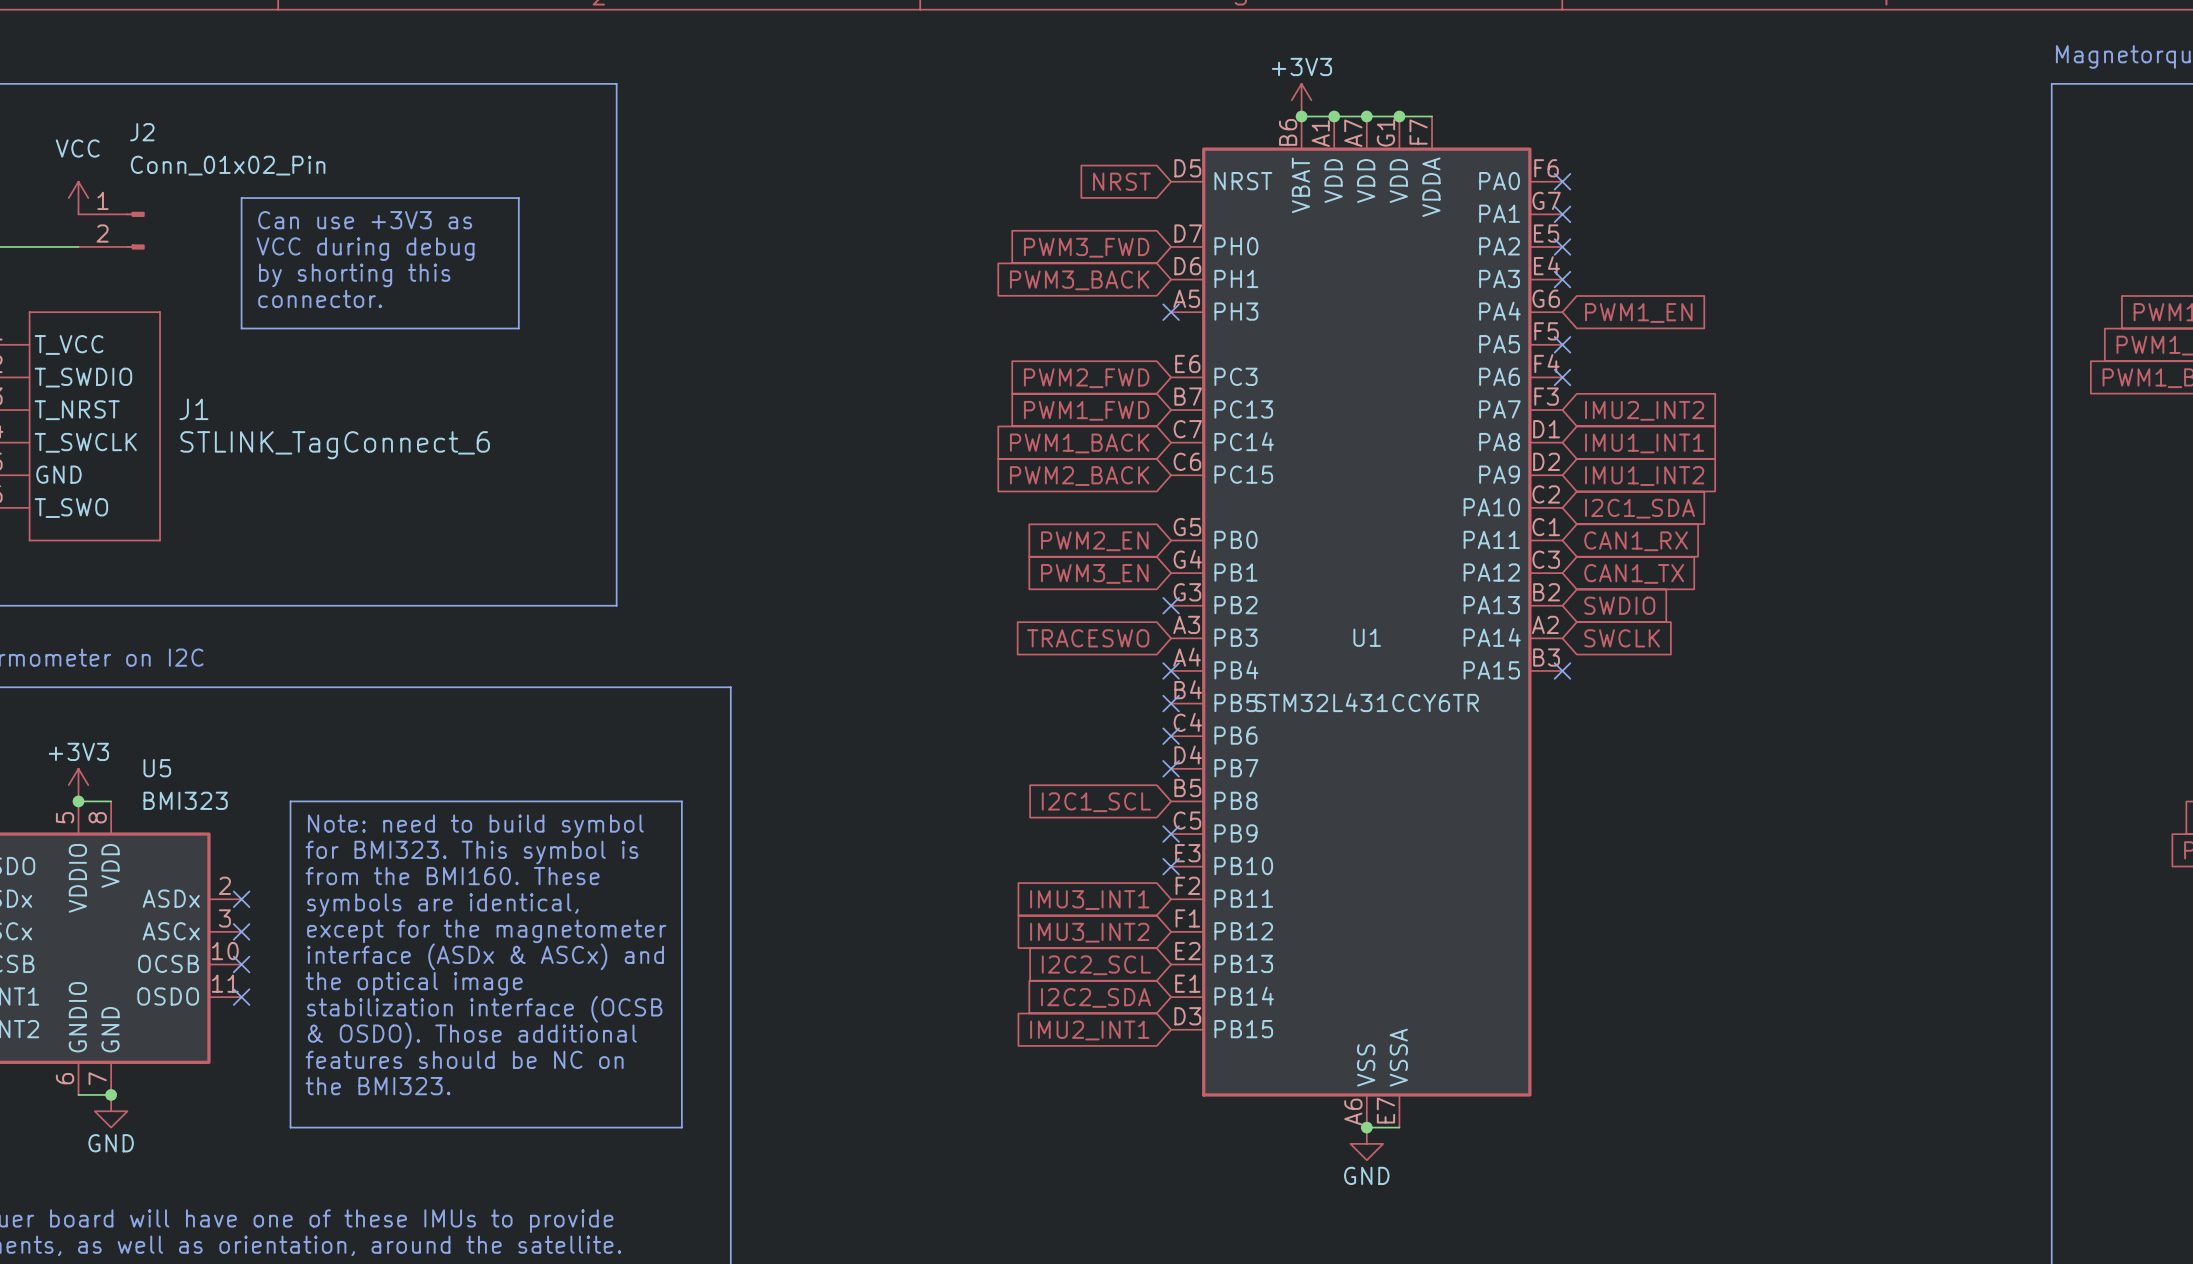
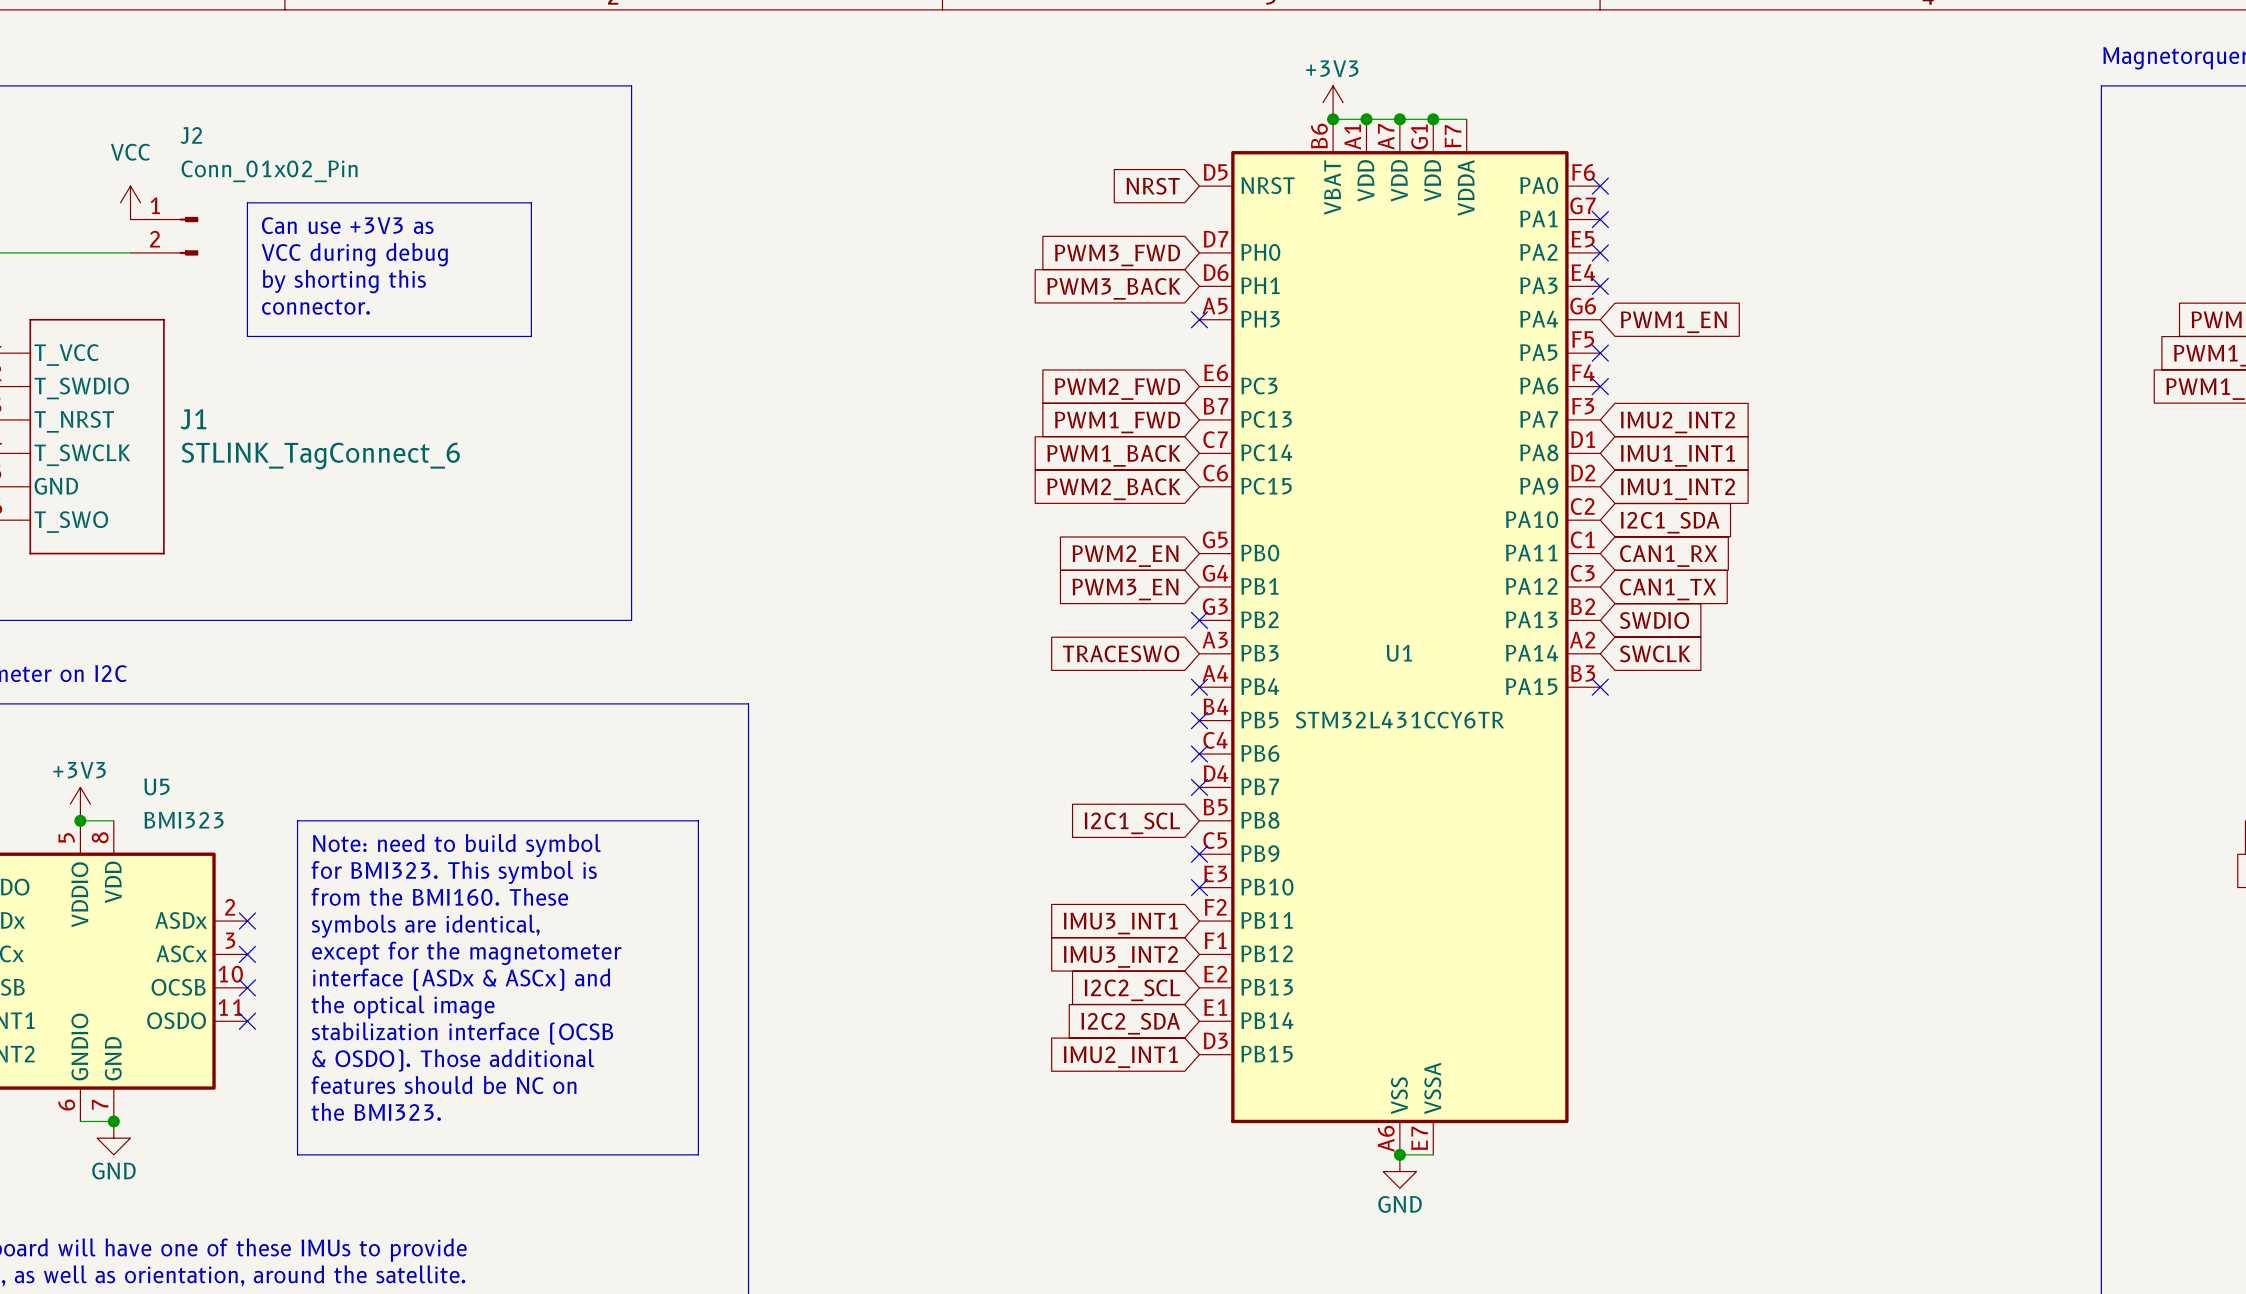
power symbol position: VCC (78, 198) -> VCC (130, 202)
J2 position: (111, 230) -> (164, 236)

